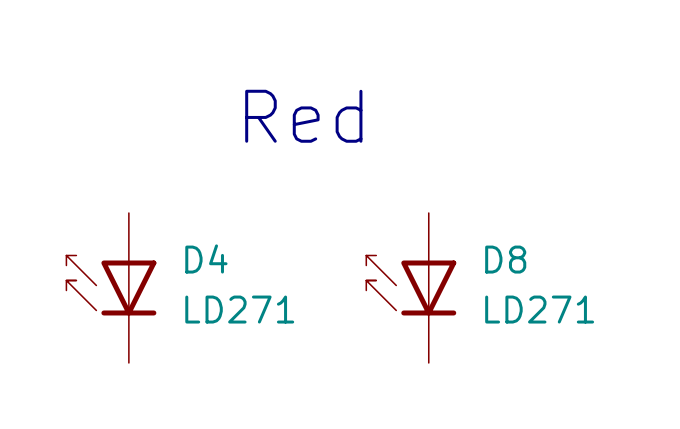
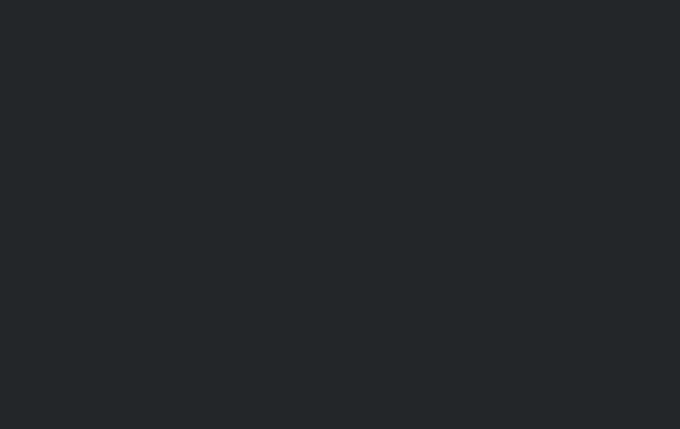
text: Red (303, 116) -> none
D4: LD271 (111, 287) -> none
D8: LD271 (411, 287) -> none

